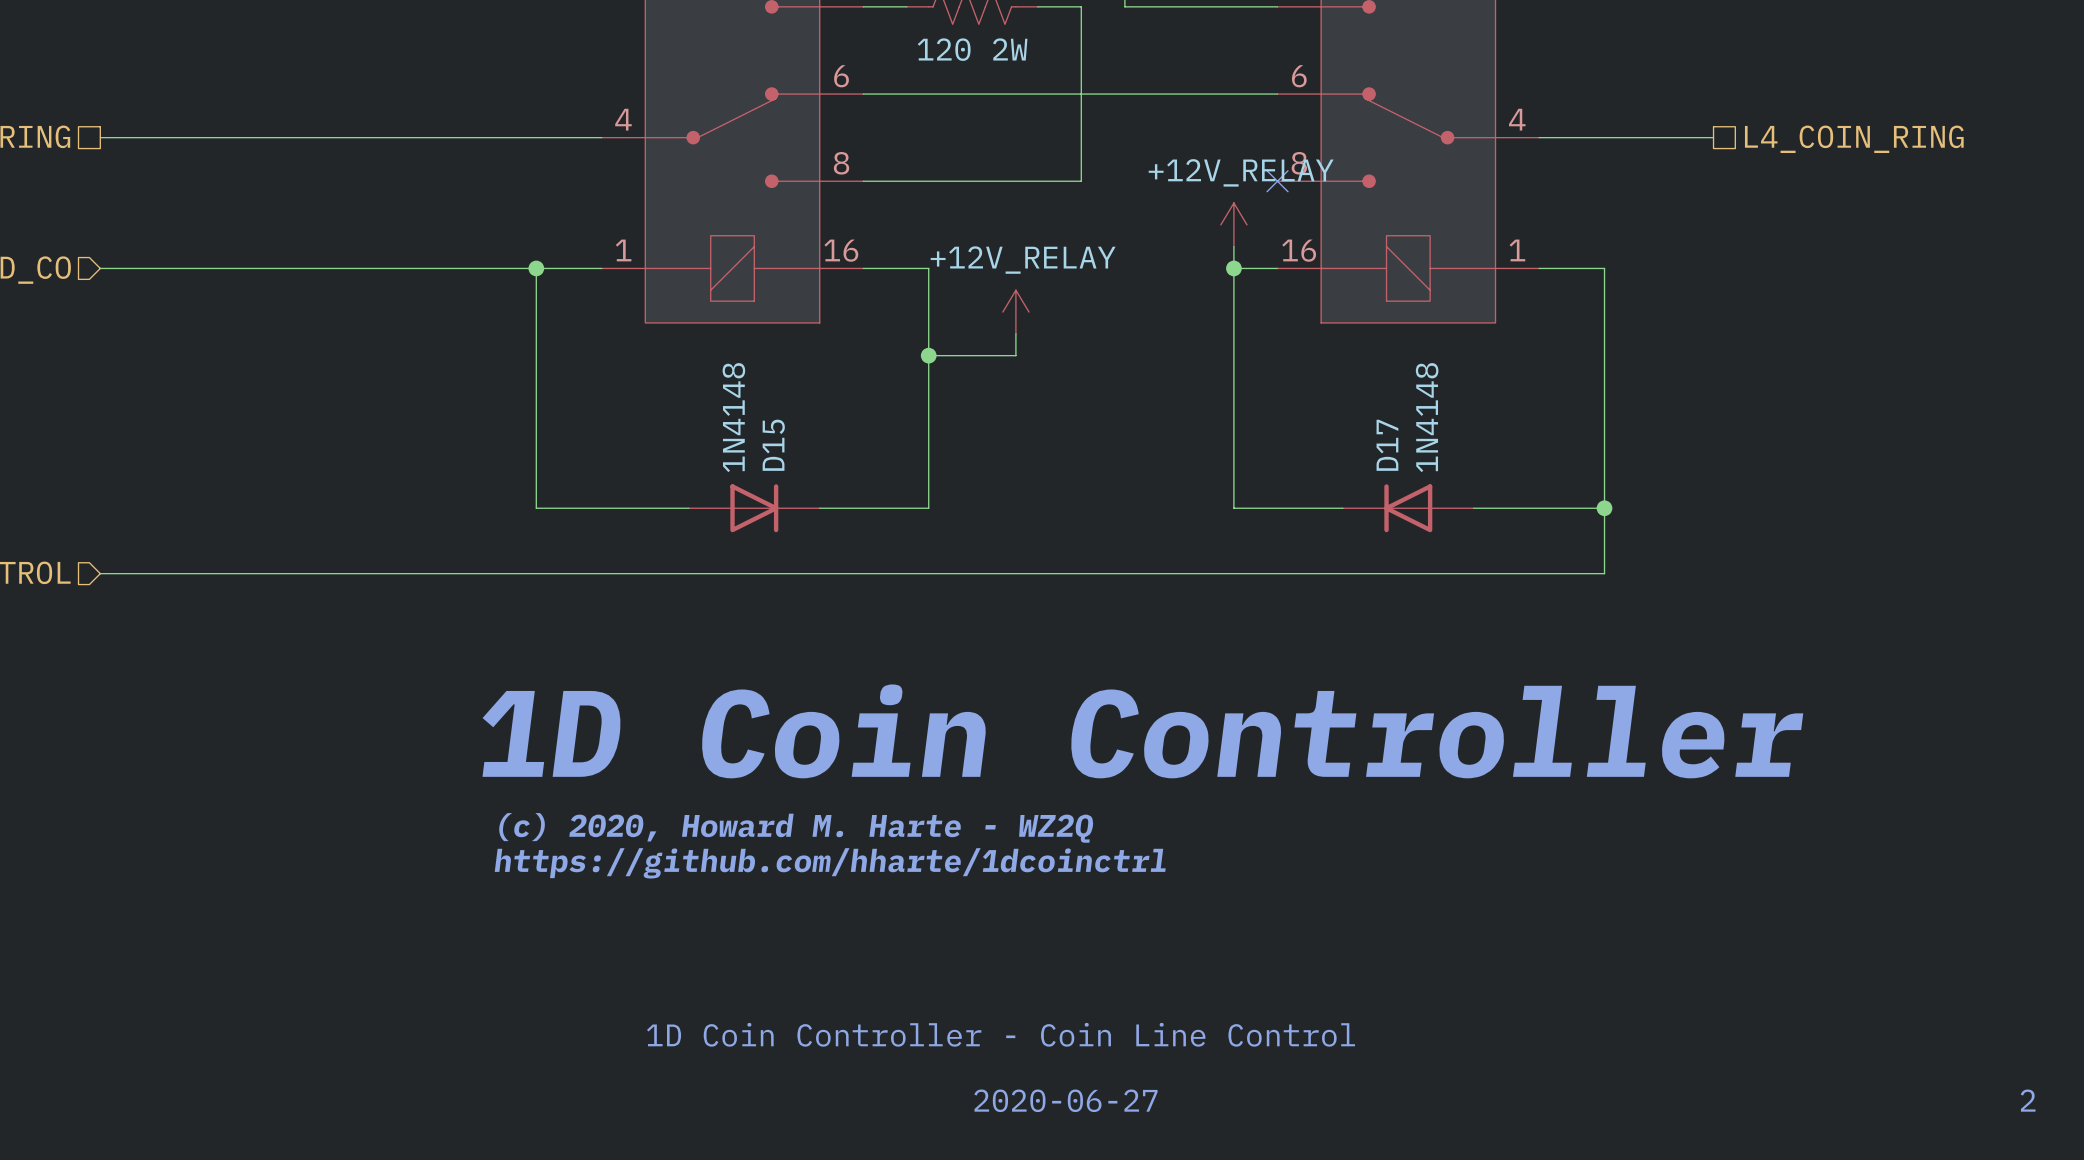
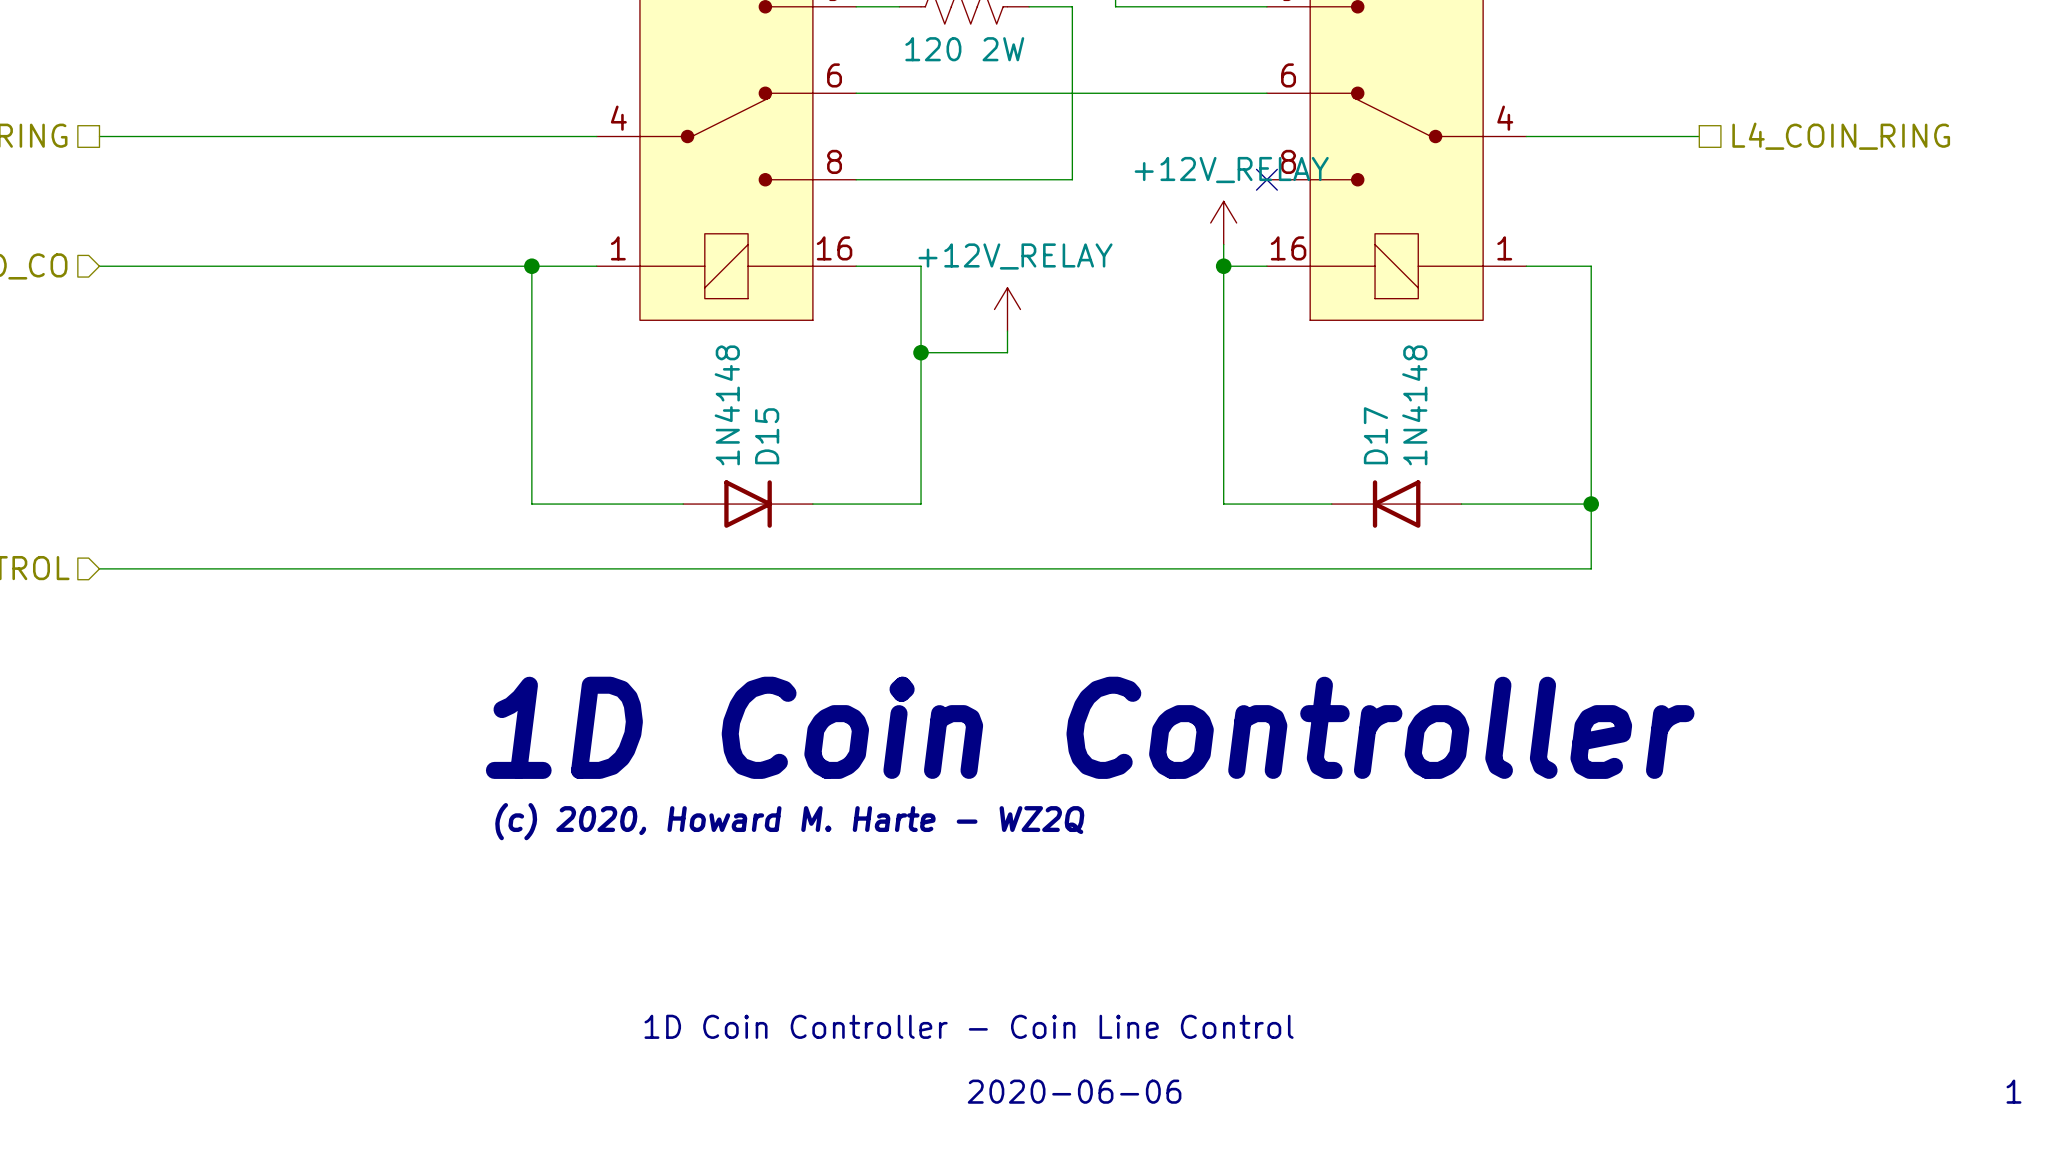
text: https://github.com/hharte/1dcoinctrl (830, 863) -> none
text: 2020-06-27 (1065, 1100) -> 2020-06-06 (1074, 1091)
text: 2 (2028, 1100) -> 1 (2013, 1091)

